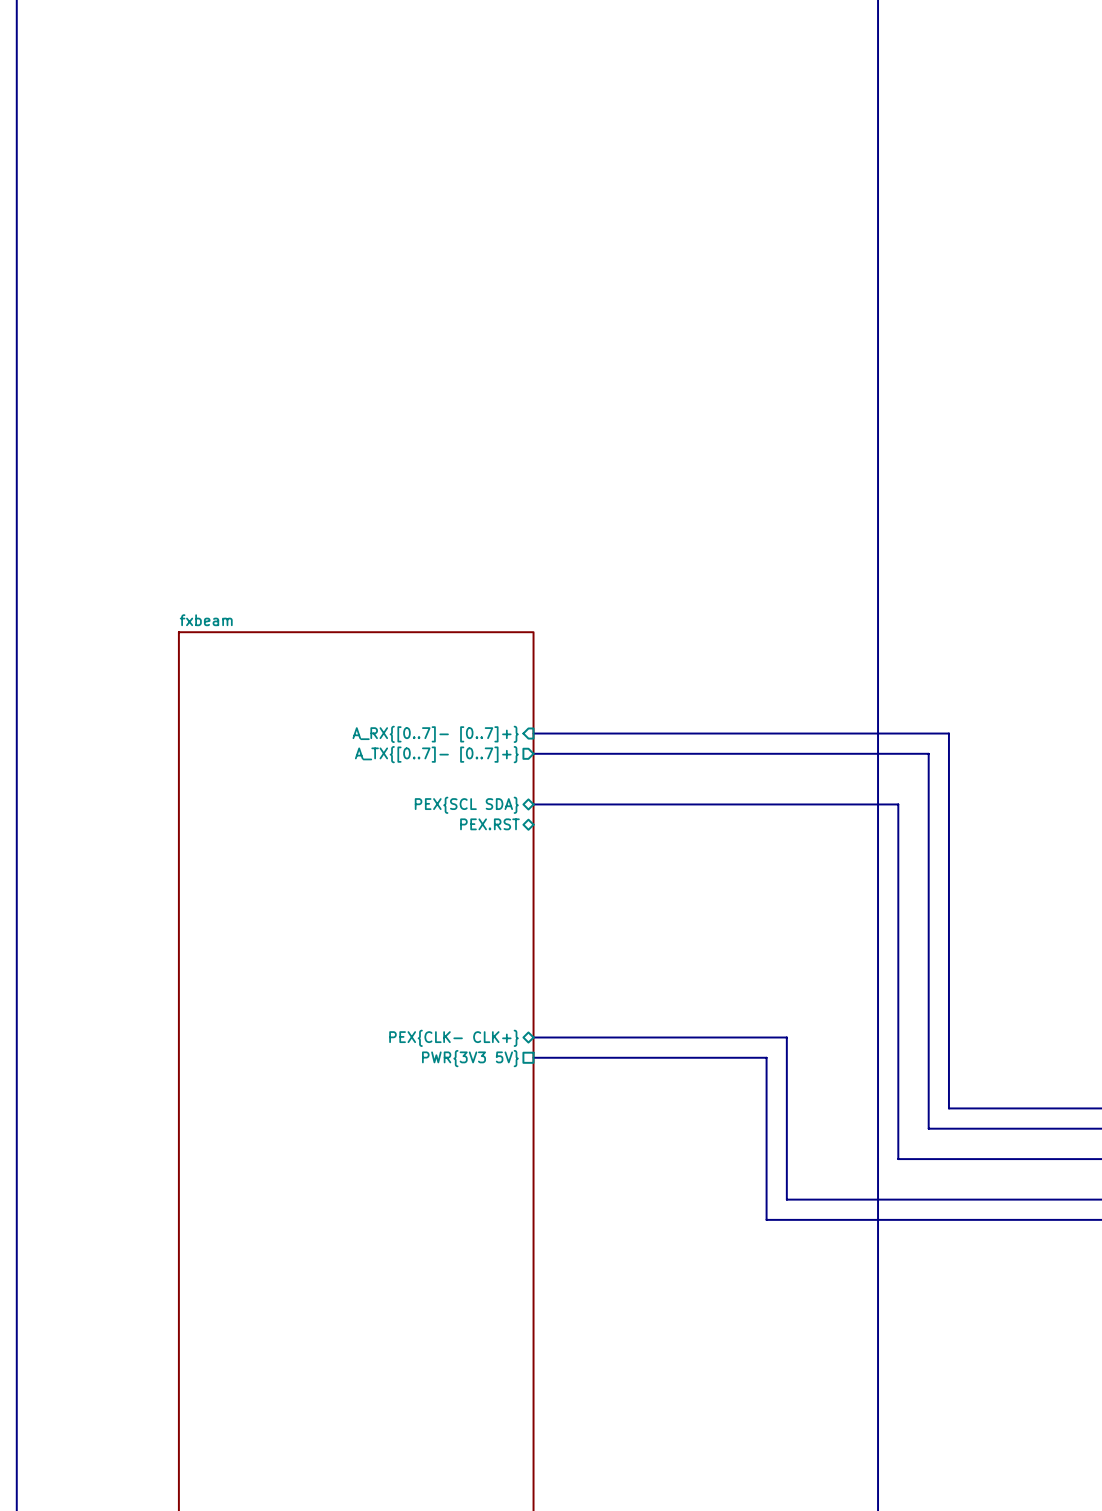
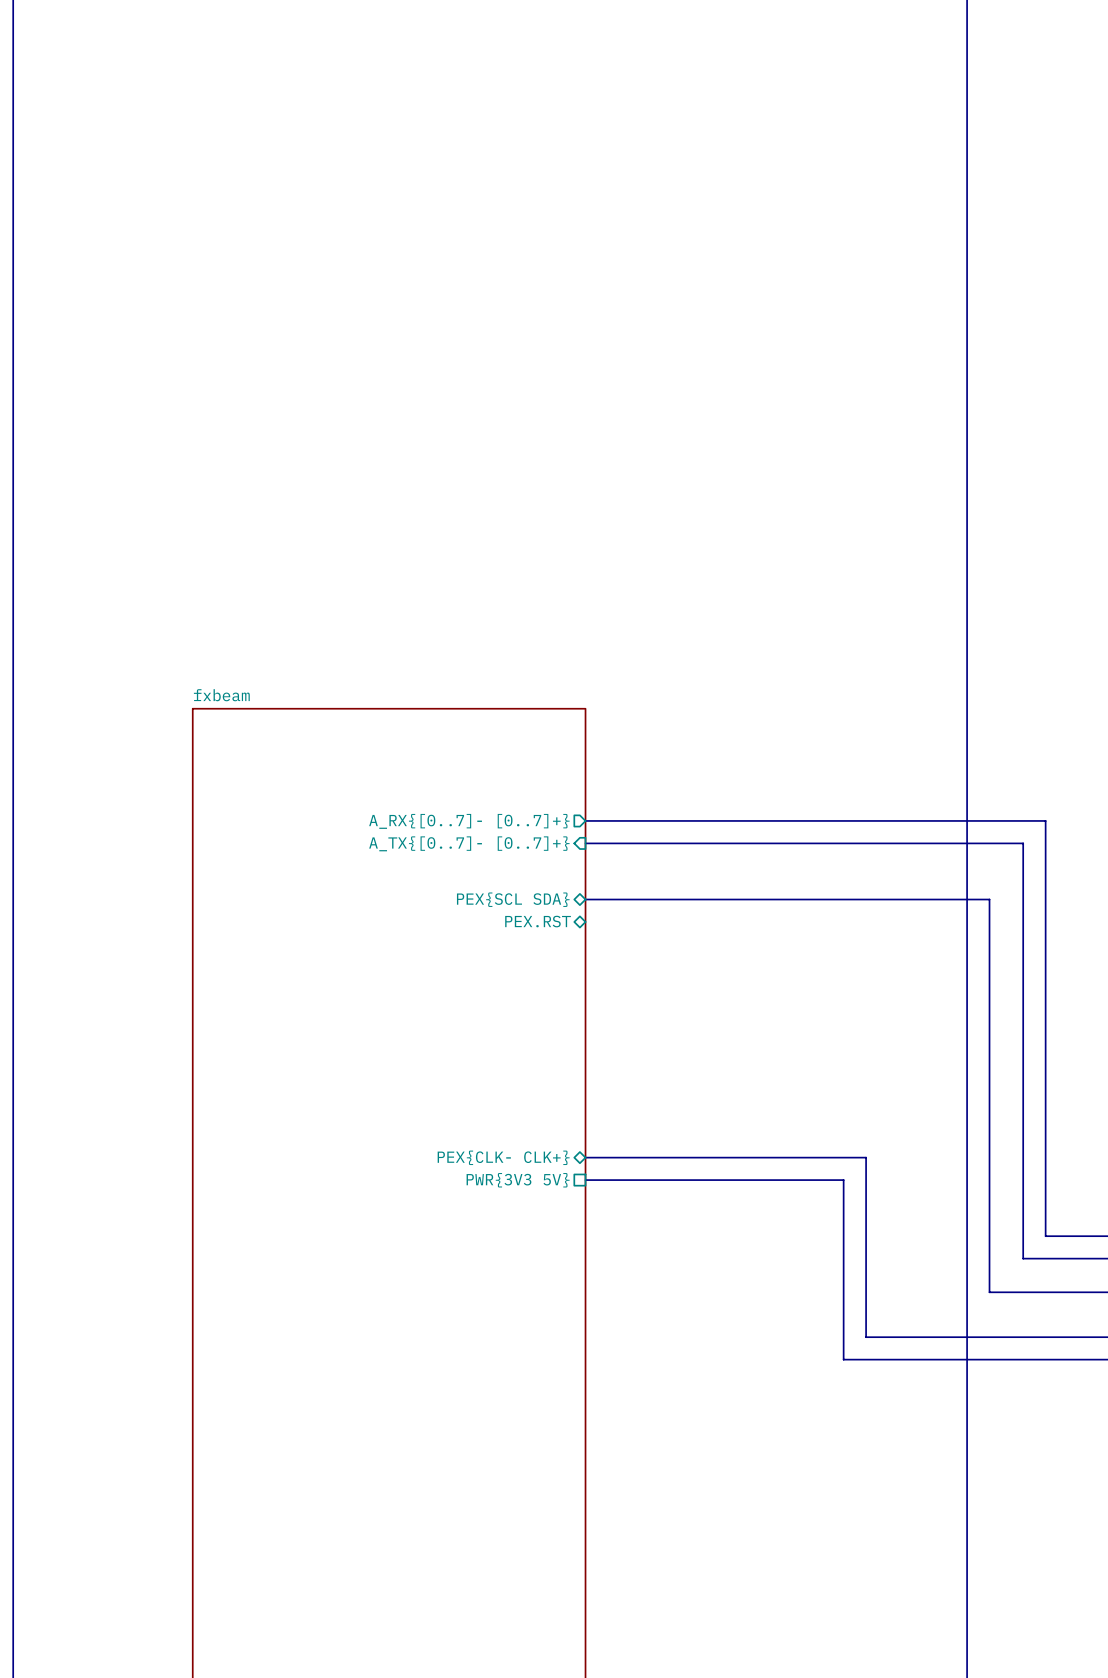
sheet pin shape: input (435, 734) -> output (469, 821)
sheet pin shape: output (436, 754) -> input (469, 843)

